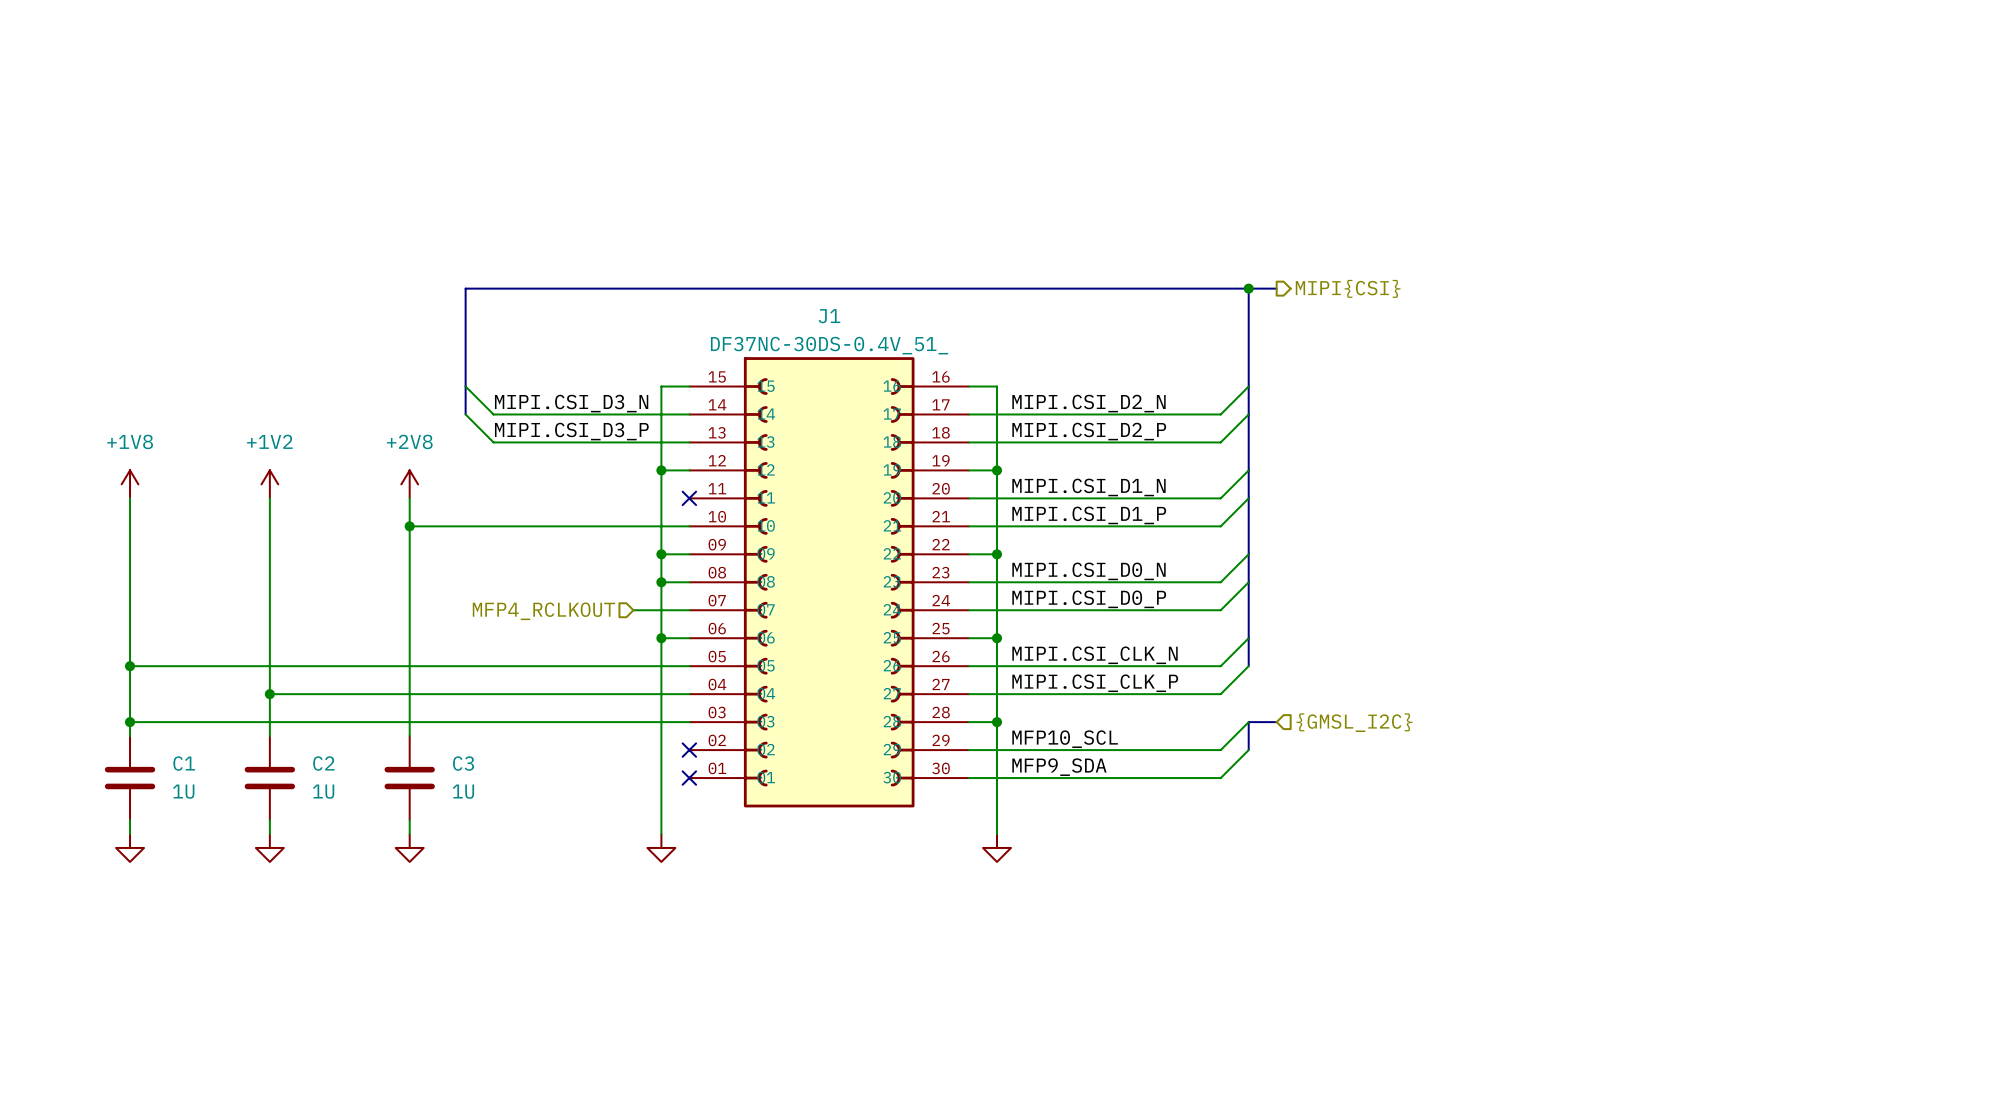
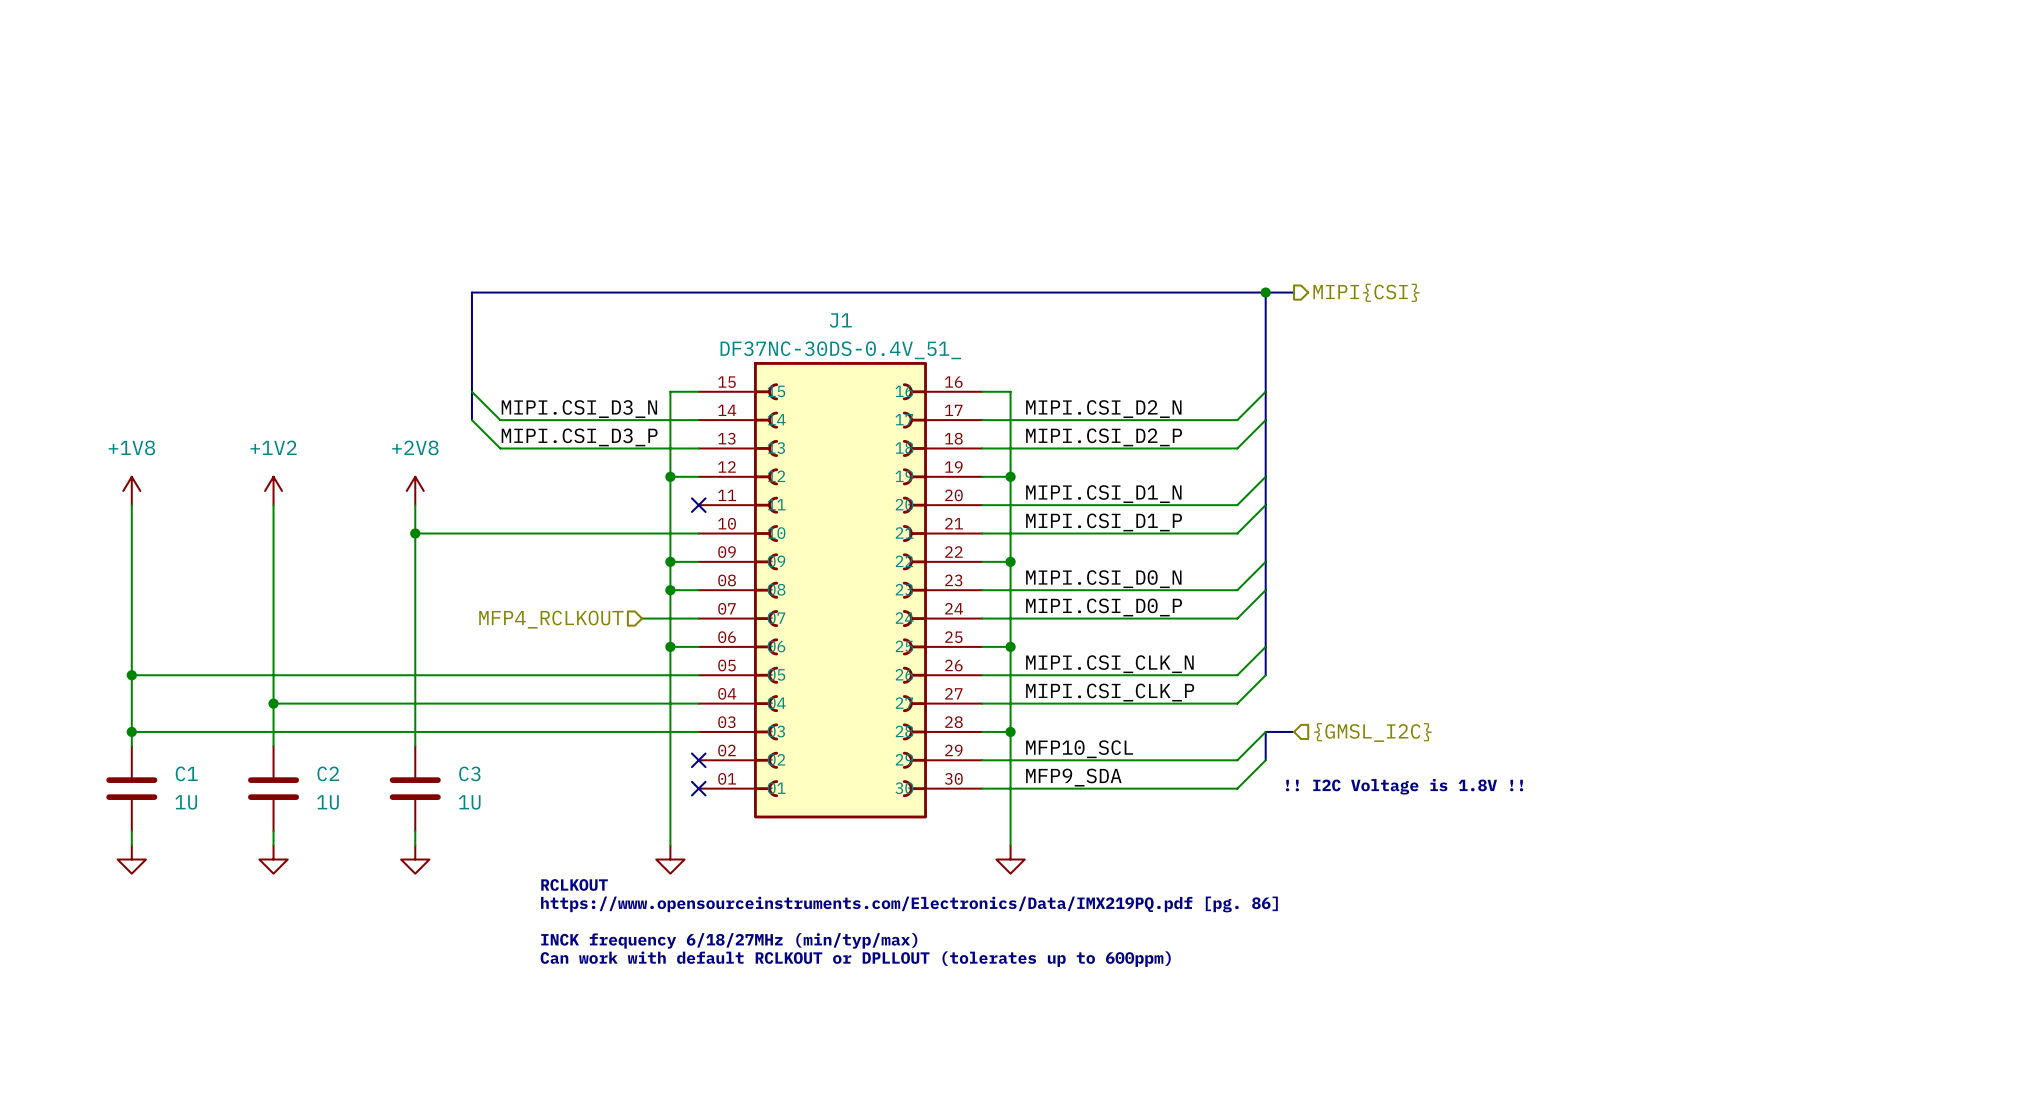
text: none -> !! I2C Voltage is 1.8V !! (1404, 786)
text: none -> RCLKOUT (574, 884)
text: none -> https://www.opensourceinstruments.com/Electronics/Data/IMX219PQ.pdf [pg. 86] (909, 904)
text: none -> INCK frequency 6/18/27MHz (min/typ/max) (729, 940)
text: none -> Can work with default RCLKOUT or DPLLOUT (tolerates up to 600ppm) (855, 959)

